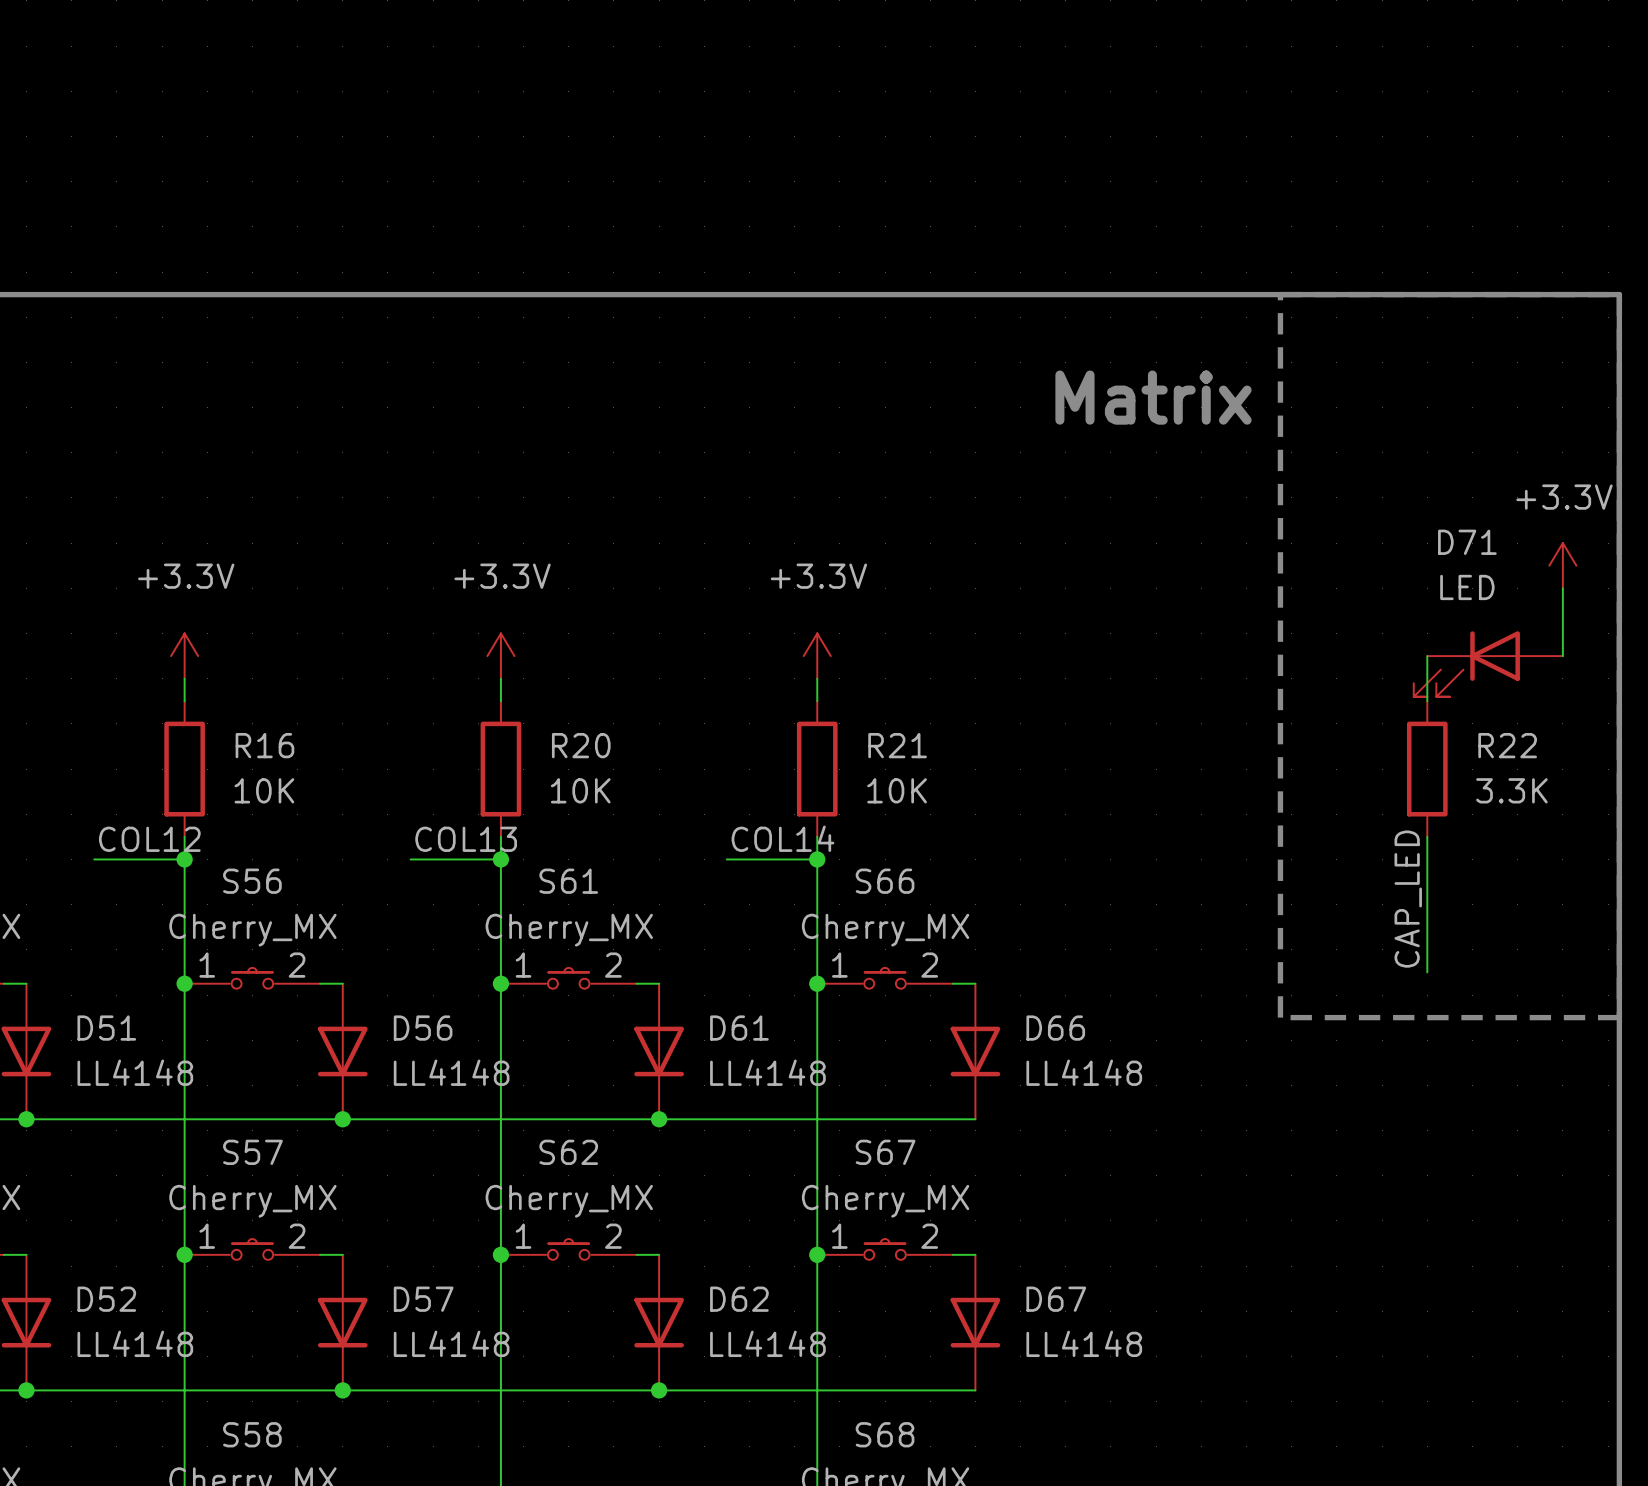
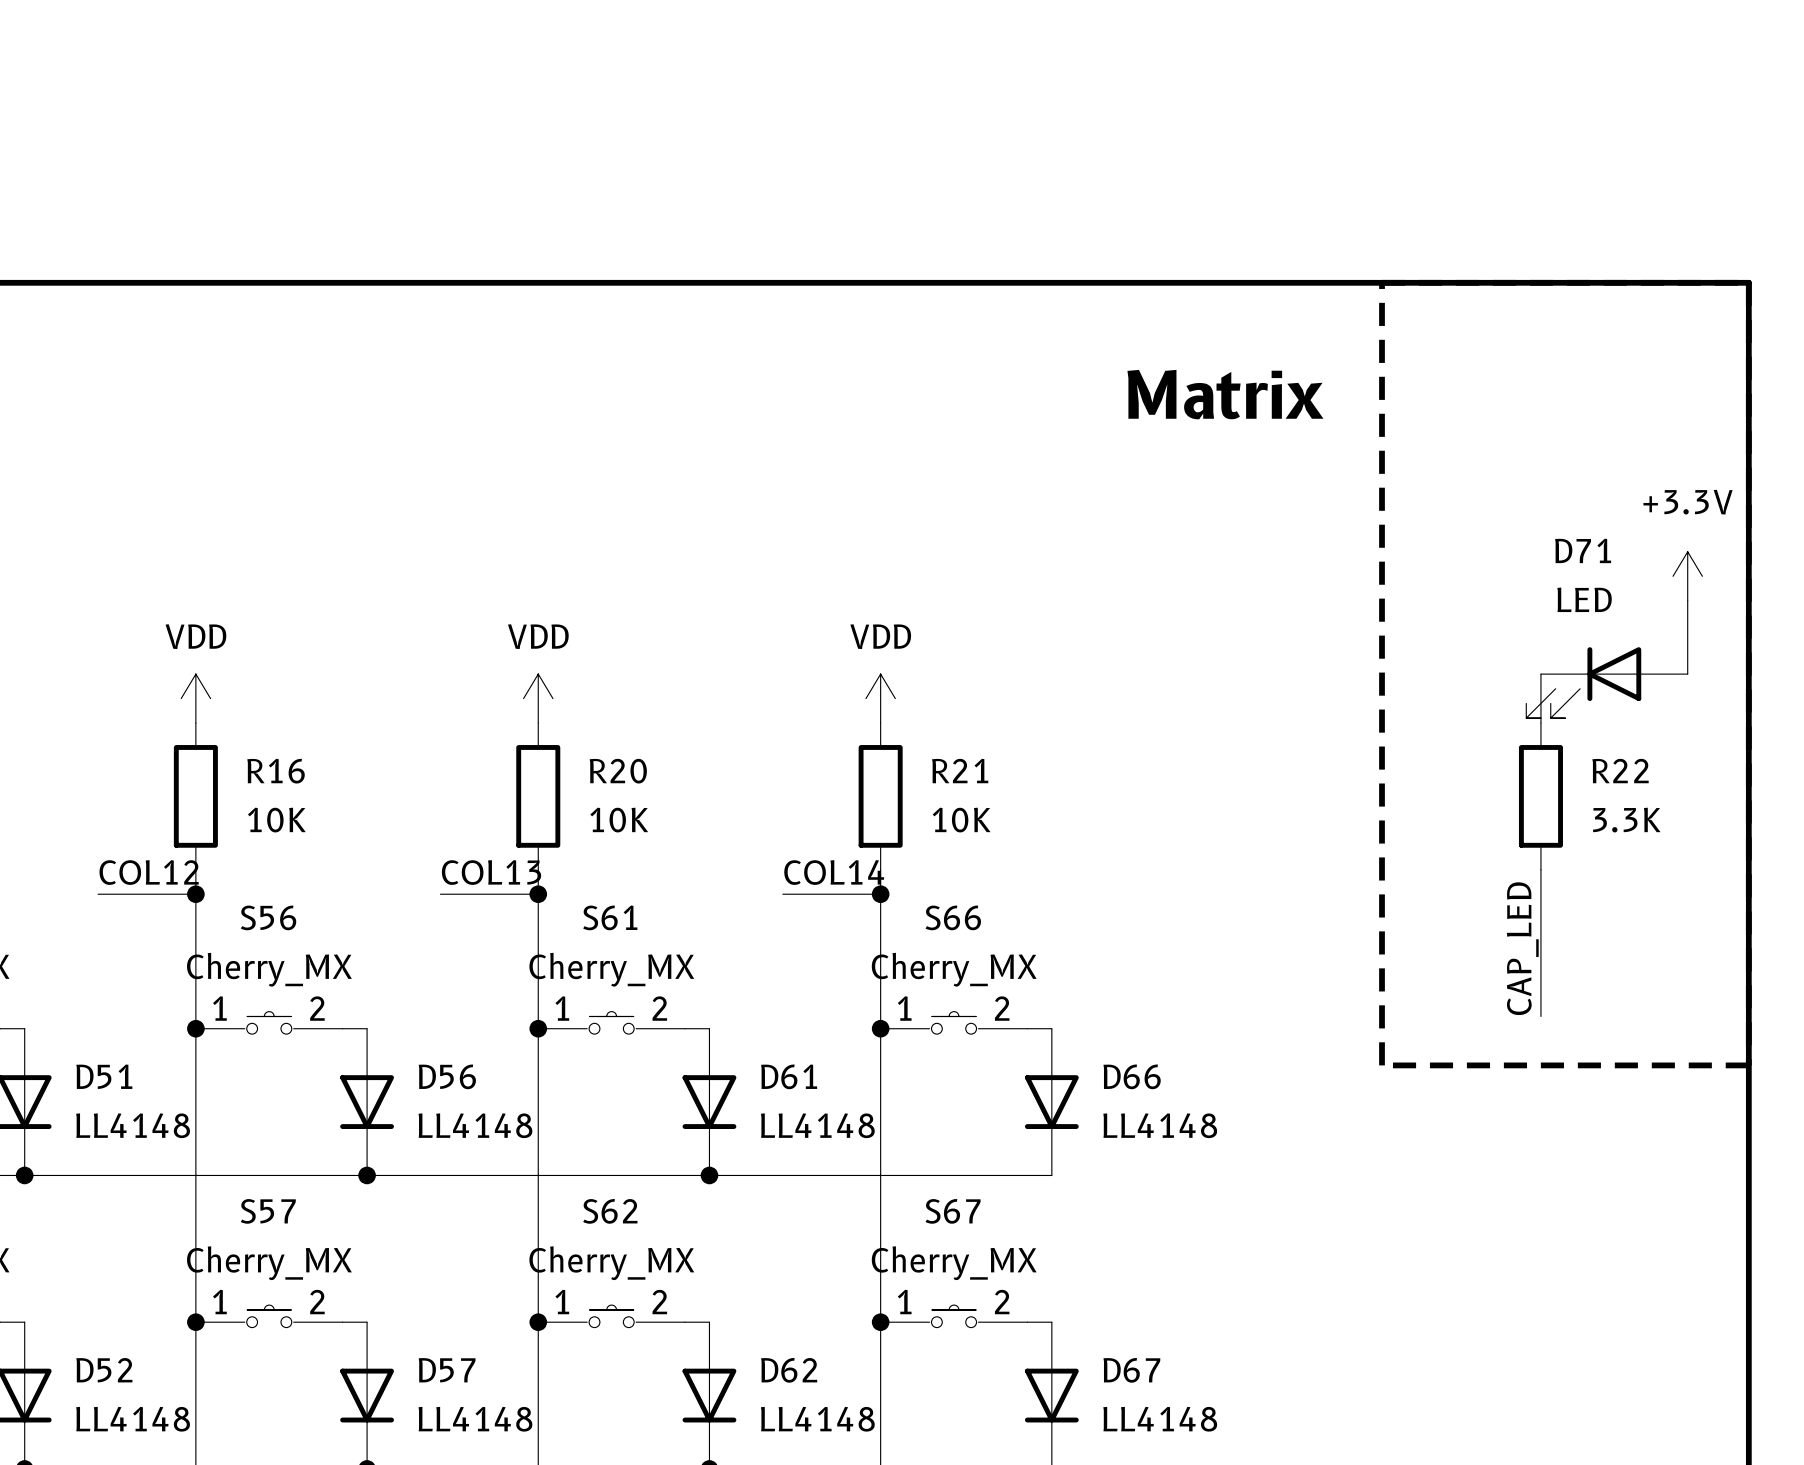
power symbol: +3.3V (184, 656) -> none
power symbol: +3.3V (500, 656) -> none
power symbol: +3.3V (817, 656) -> none
power symbol: none -> VDD (195, 698)
power symbol: none -> VDD (538, 698)
power symbol: none -> VDD (880, 698)

